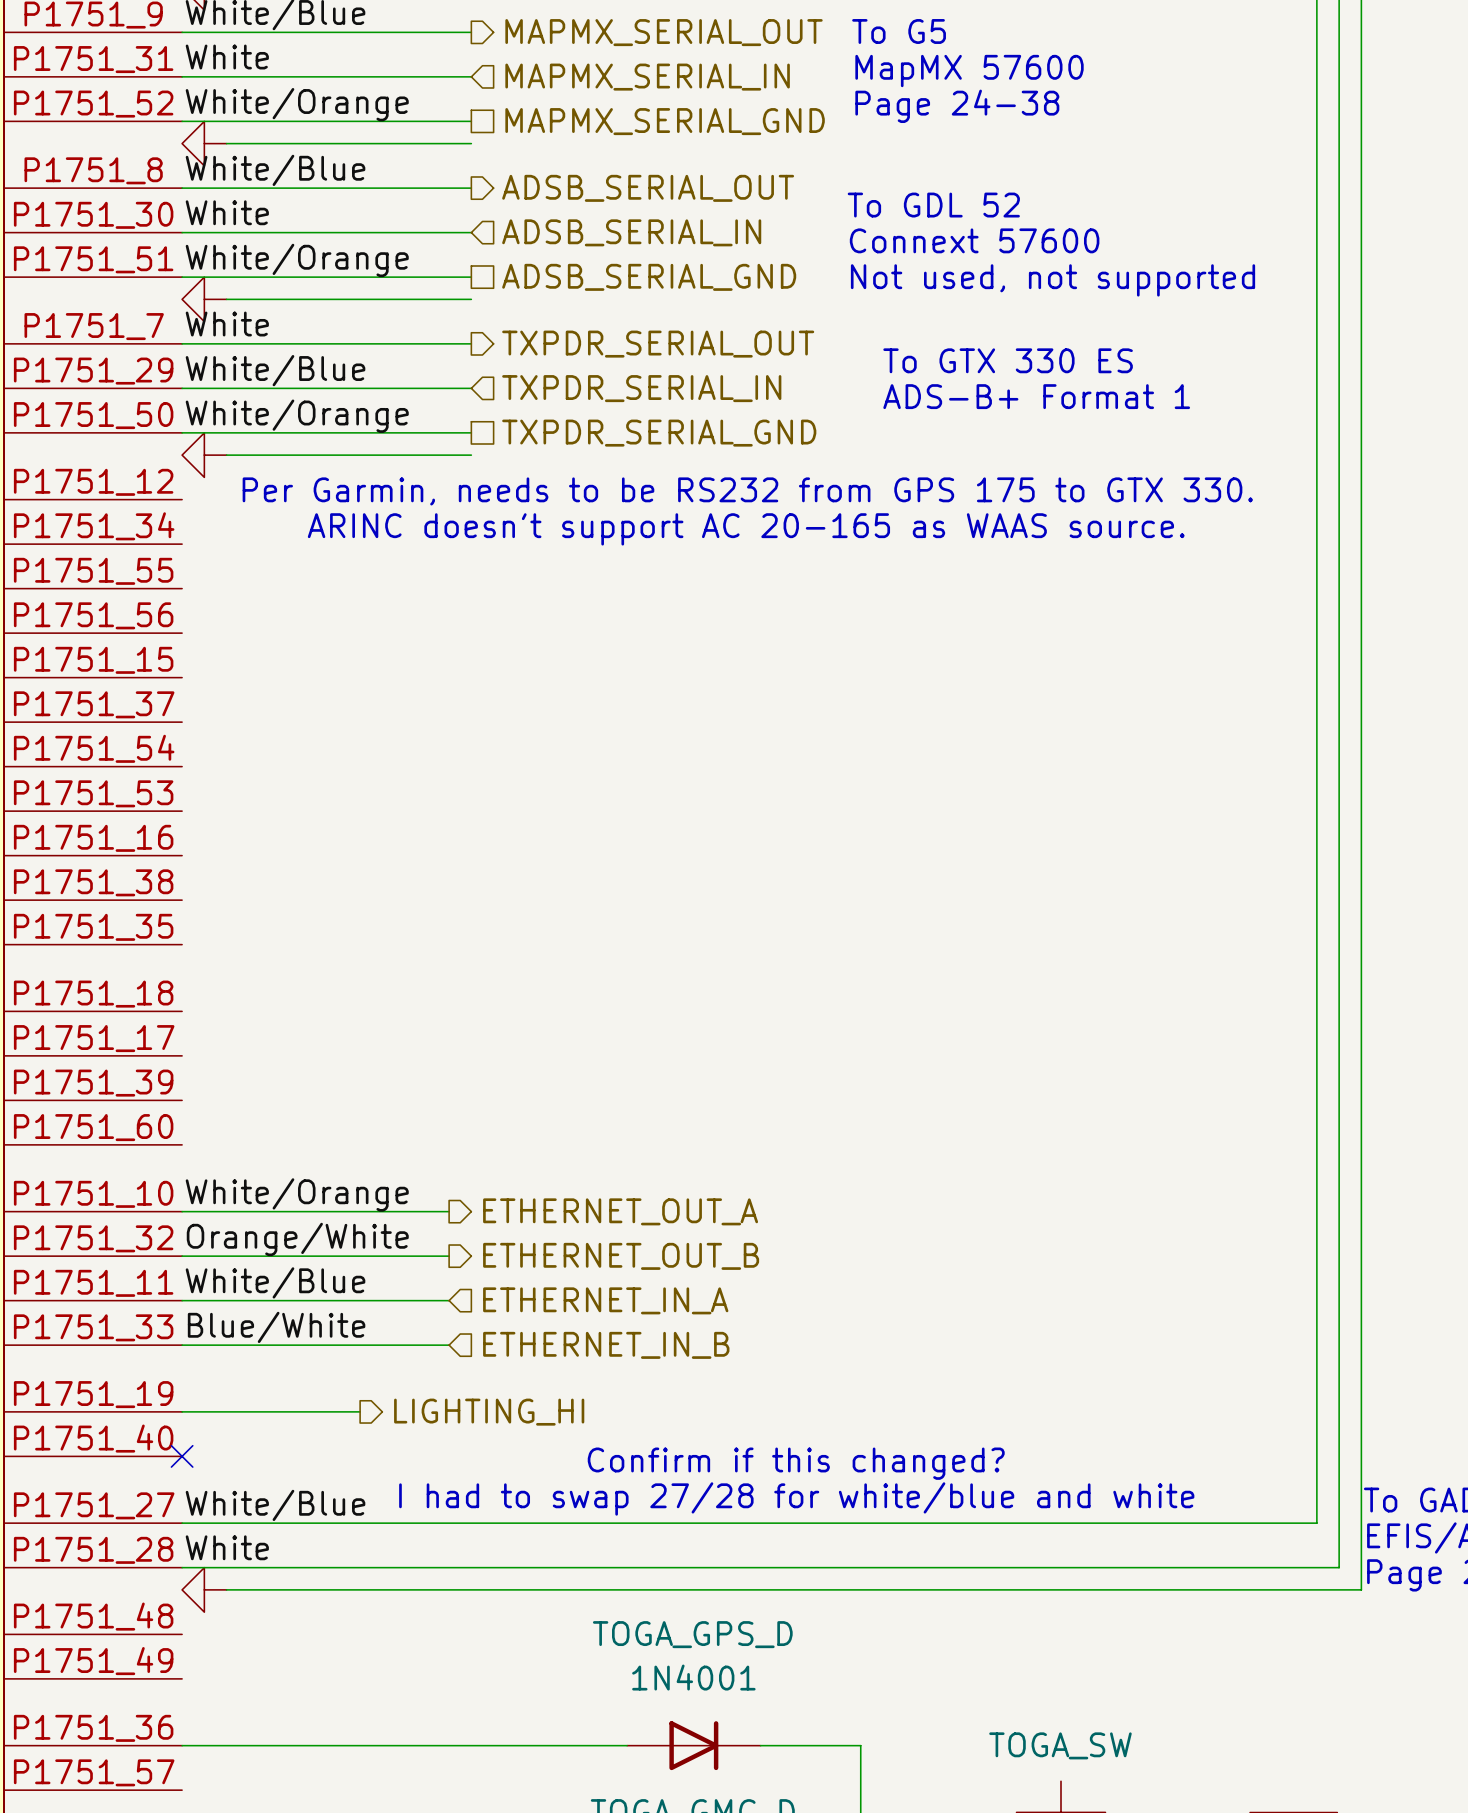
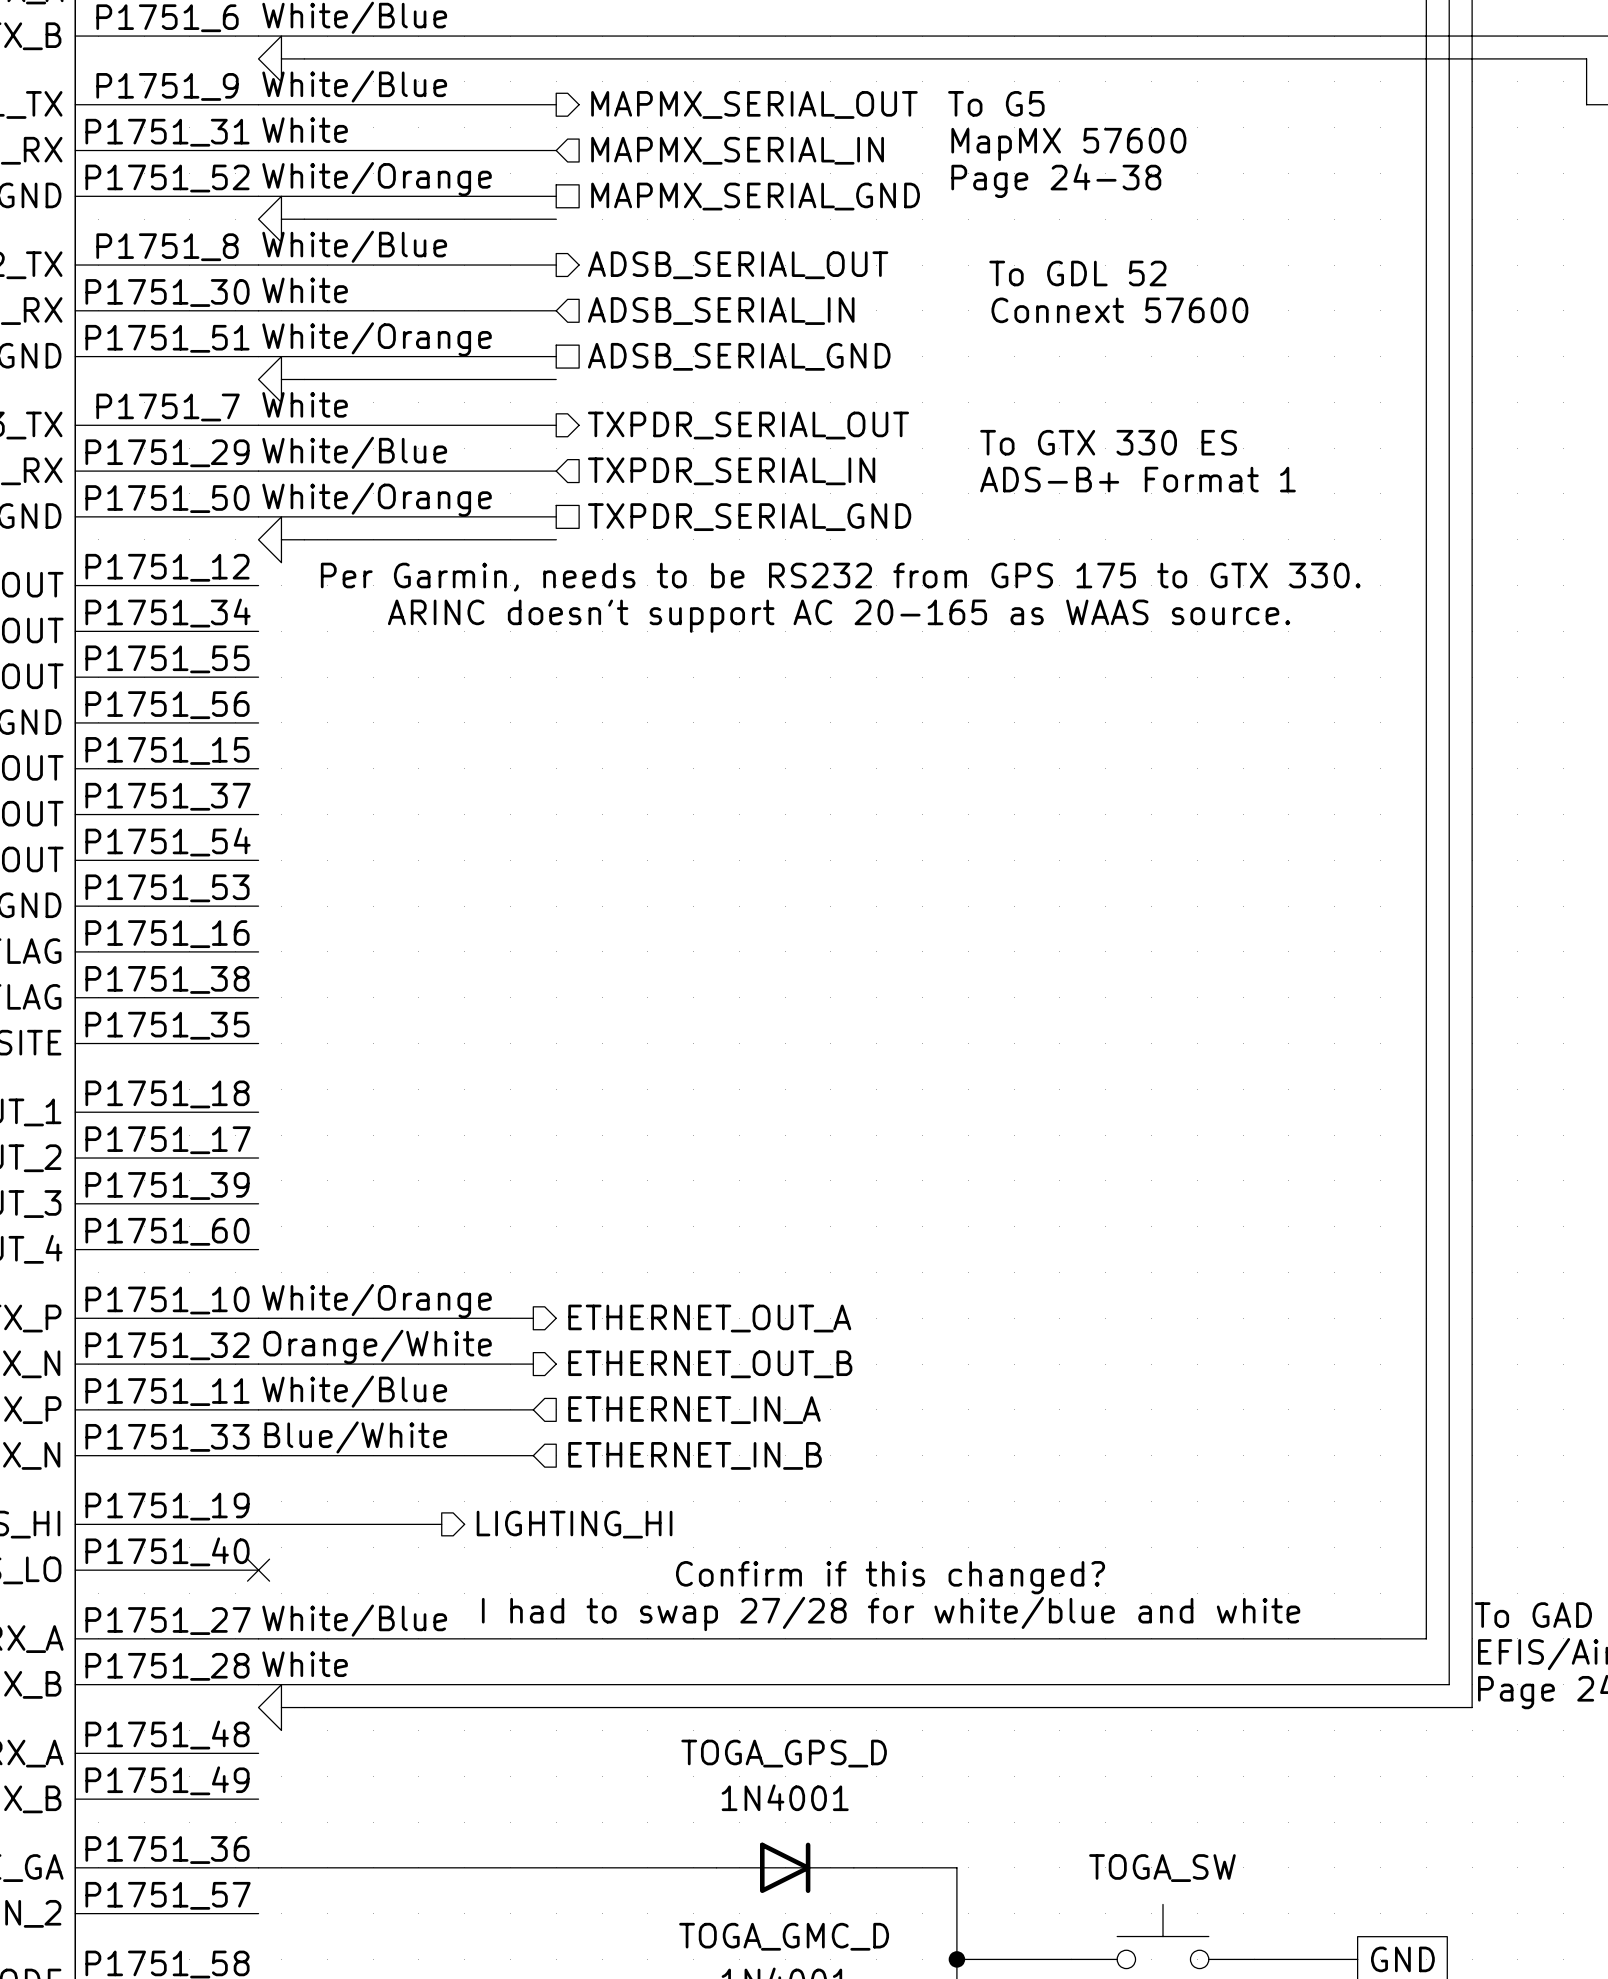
text position: To GDL 52 (933, 205) -> To GDL 52 (1077, 273)
text position: Connext 57600 (974, 240) -> Connext 57600 (1119, 310)
text: Not used, not supported (1053, 280) -> none

